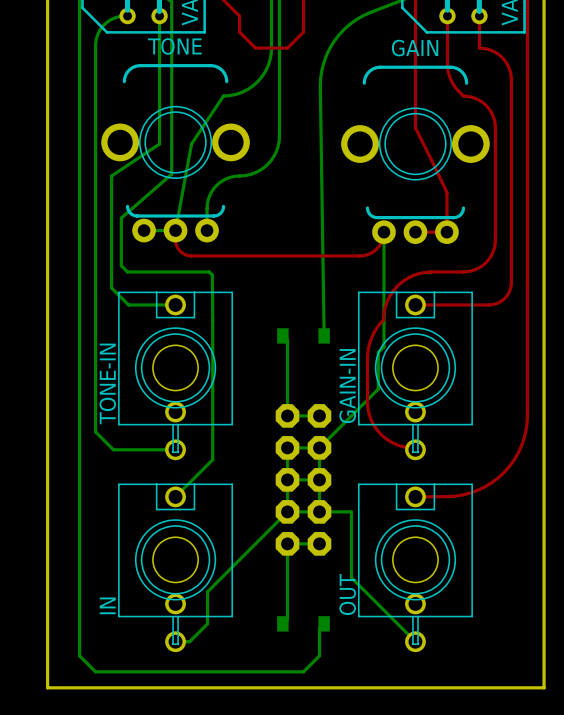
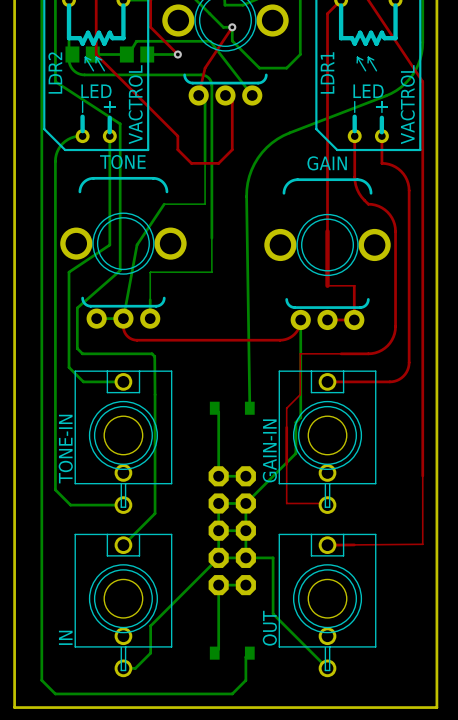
bottom track: (271, 48) (267, 66) (257, 81) (241, 92) (223, 96) -> (205, 163) (205, 204) (164, 204)
top track: (415, 128) (446, 192) -> (327, 231) (327, 285) (354, 286)
bottom track: (279, 136) (276, 151) (267, 164) (254, 172) (231, 177) (219, 182) (209, 196) (207, 208) -> (211, 238) (211, 272) (150, 272) (150, 299)
top track: (431, 271) (419, 273) (407, 278) (393, 290) (385, 307) (383, 319) (371, 337) (367, 358) -> (341, 353) (300, 353) (300, 394) (286, 408) (286, 427)
top track: (367, 401) (370, 419) (380, 434) (395, 444) (413, 447) -> (286, 464) (286, 503) (325, 503)
top track: (527, 415) (525, 431) (521, 446) (513, 460) (503, 472) (491, 482) (477, 490) (462, 494) (447, 496) -> (422, 475) (422, 544) (354, 544)

